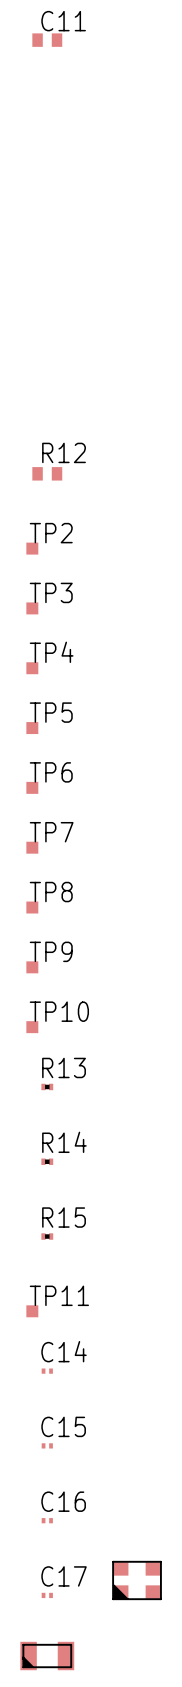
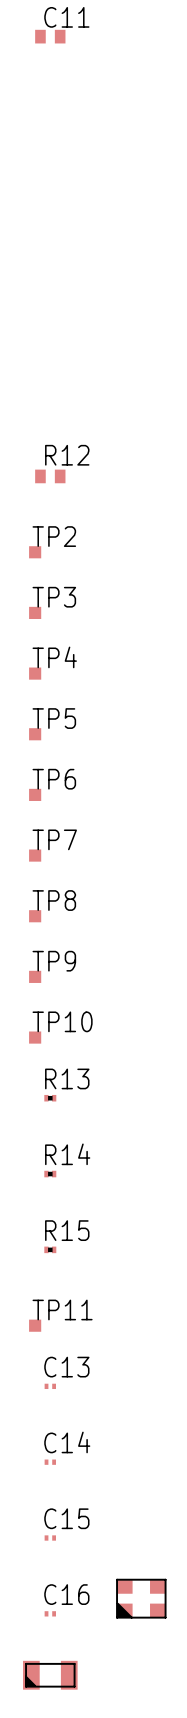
C14 name: C14 (64, 1351) -> C13 (66, 1367)
C15 name: C15 (63, 1426) -> C14 (67, 1442)
C16 name: C16 (63, 1501) -> C15 (66, 1518)
C17 name: C17 (64, 1576) -> C16 (66, 1594)

